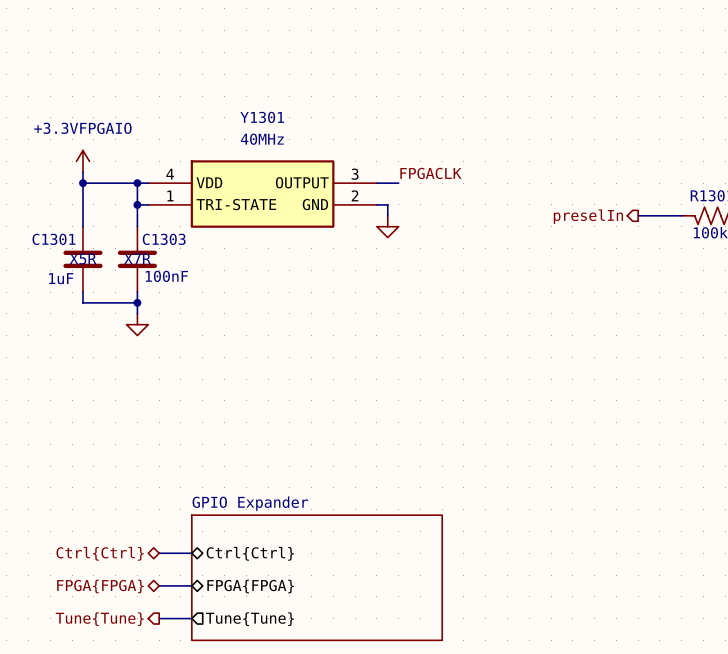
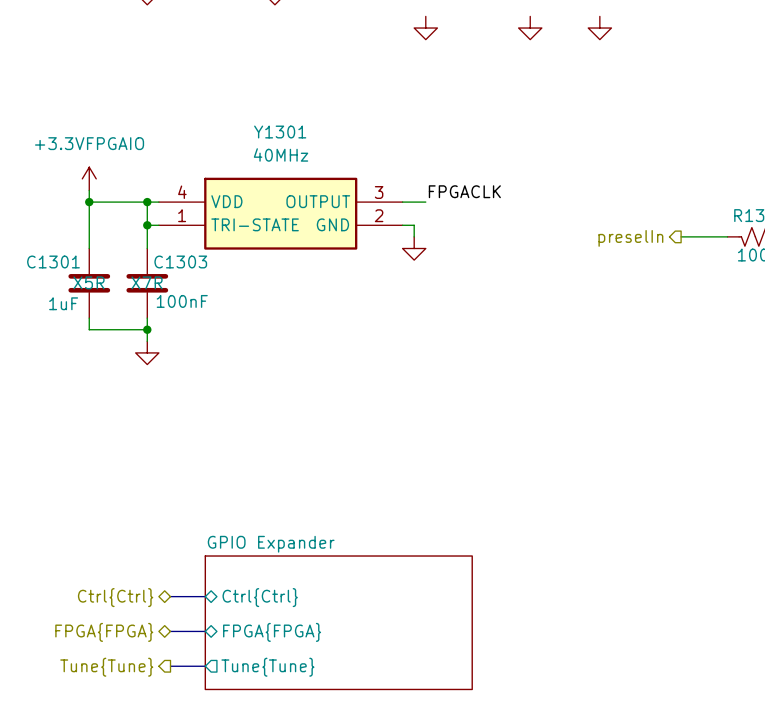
power symbol: none -> (425, 28)
power symbol: none -> (530, 28)
power symbol: none -> (599, 28)

